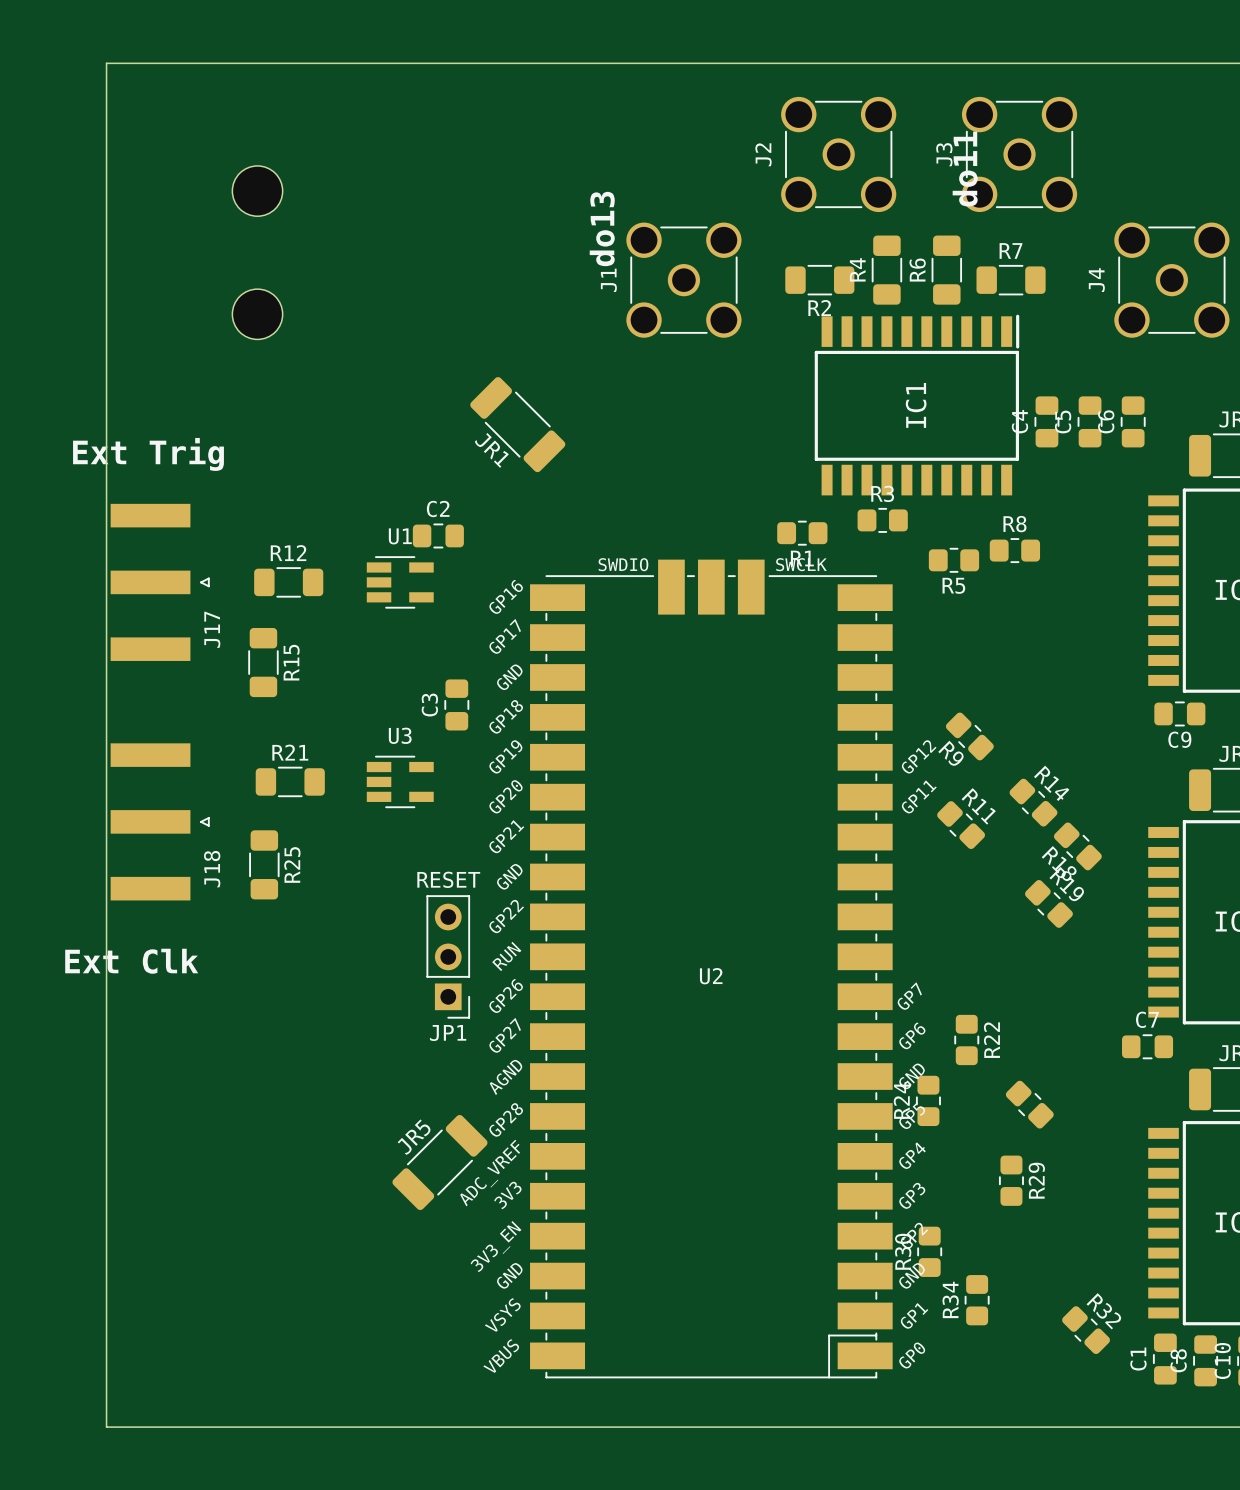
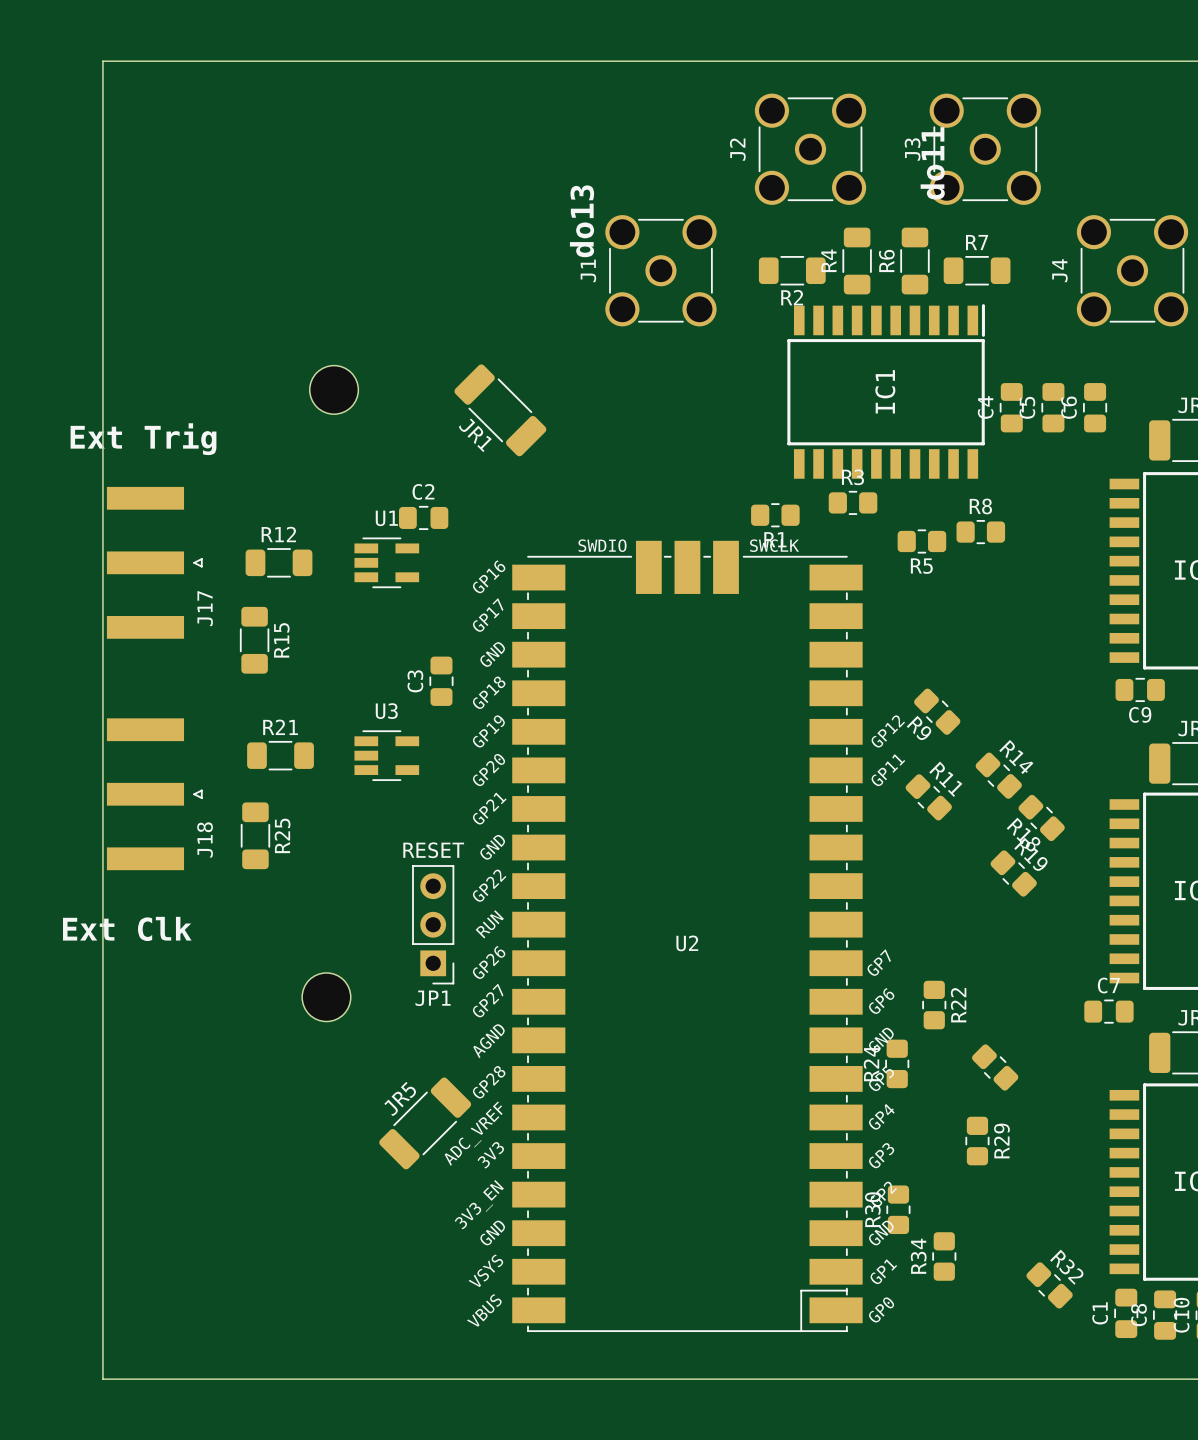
part: (257, 191) -> none
part: (257, 314) -> none
part: none -> (334, 389)
part: none -> (326, 997)

